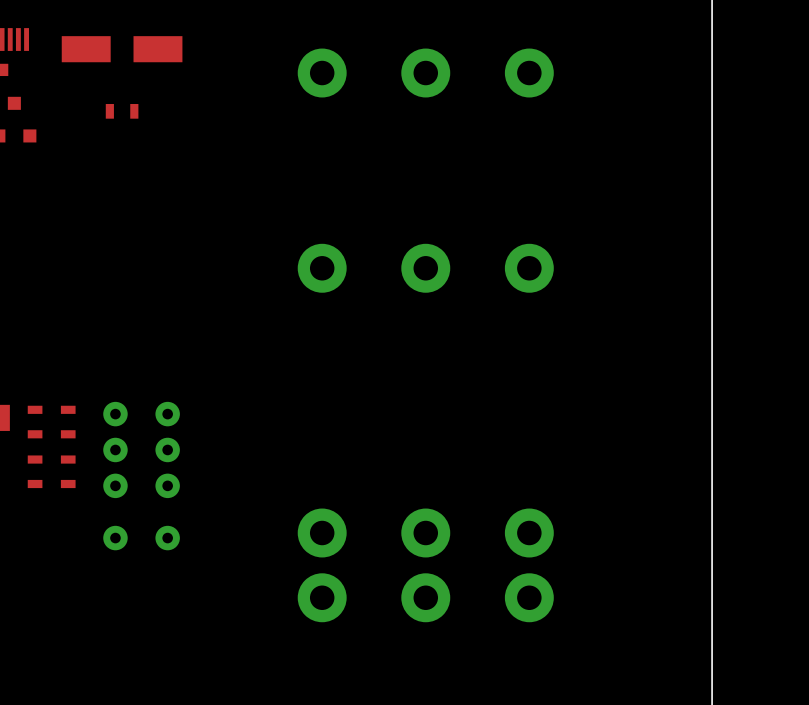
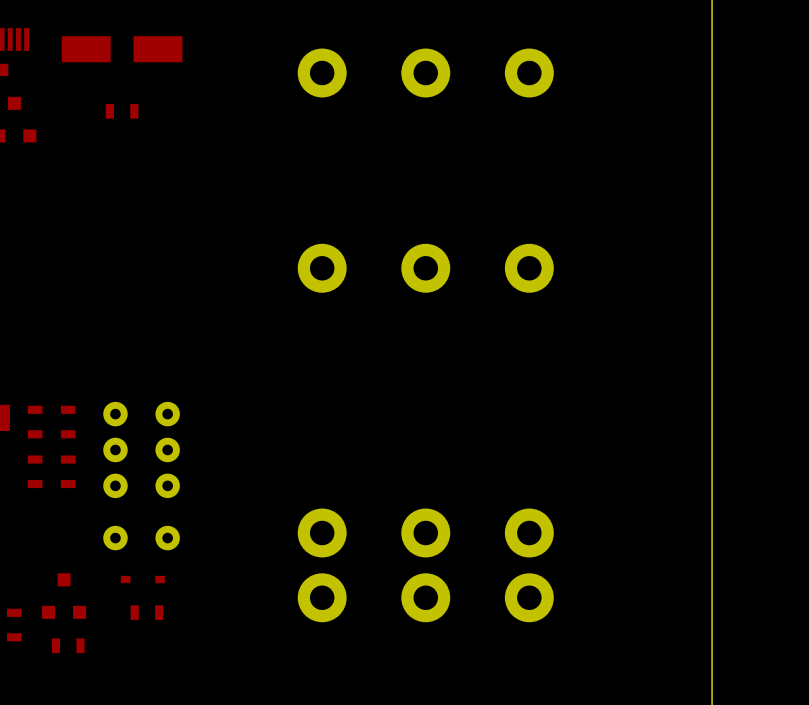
part: none -> (142, 579)
part: none -> (64, 596)
part: none -> (146, 612)
part: none -> (14, 625)
part: none -> (68, 645)

